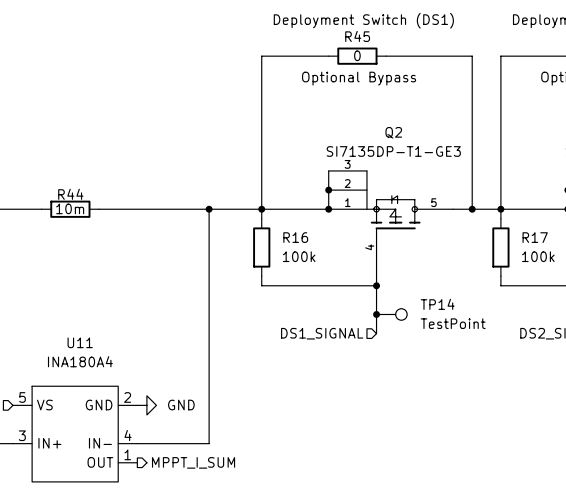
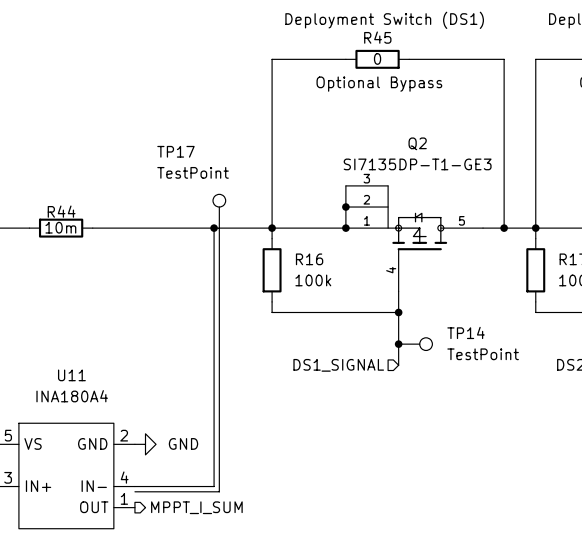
TP17: none -> TestPoint (219, 211)
wire: none -> (219, 228) (219, 491) (134, 491)

